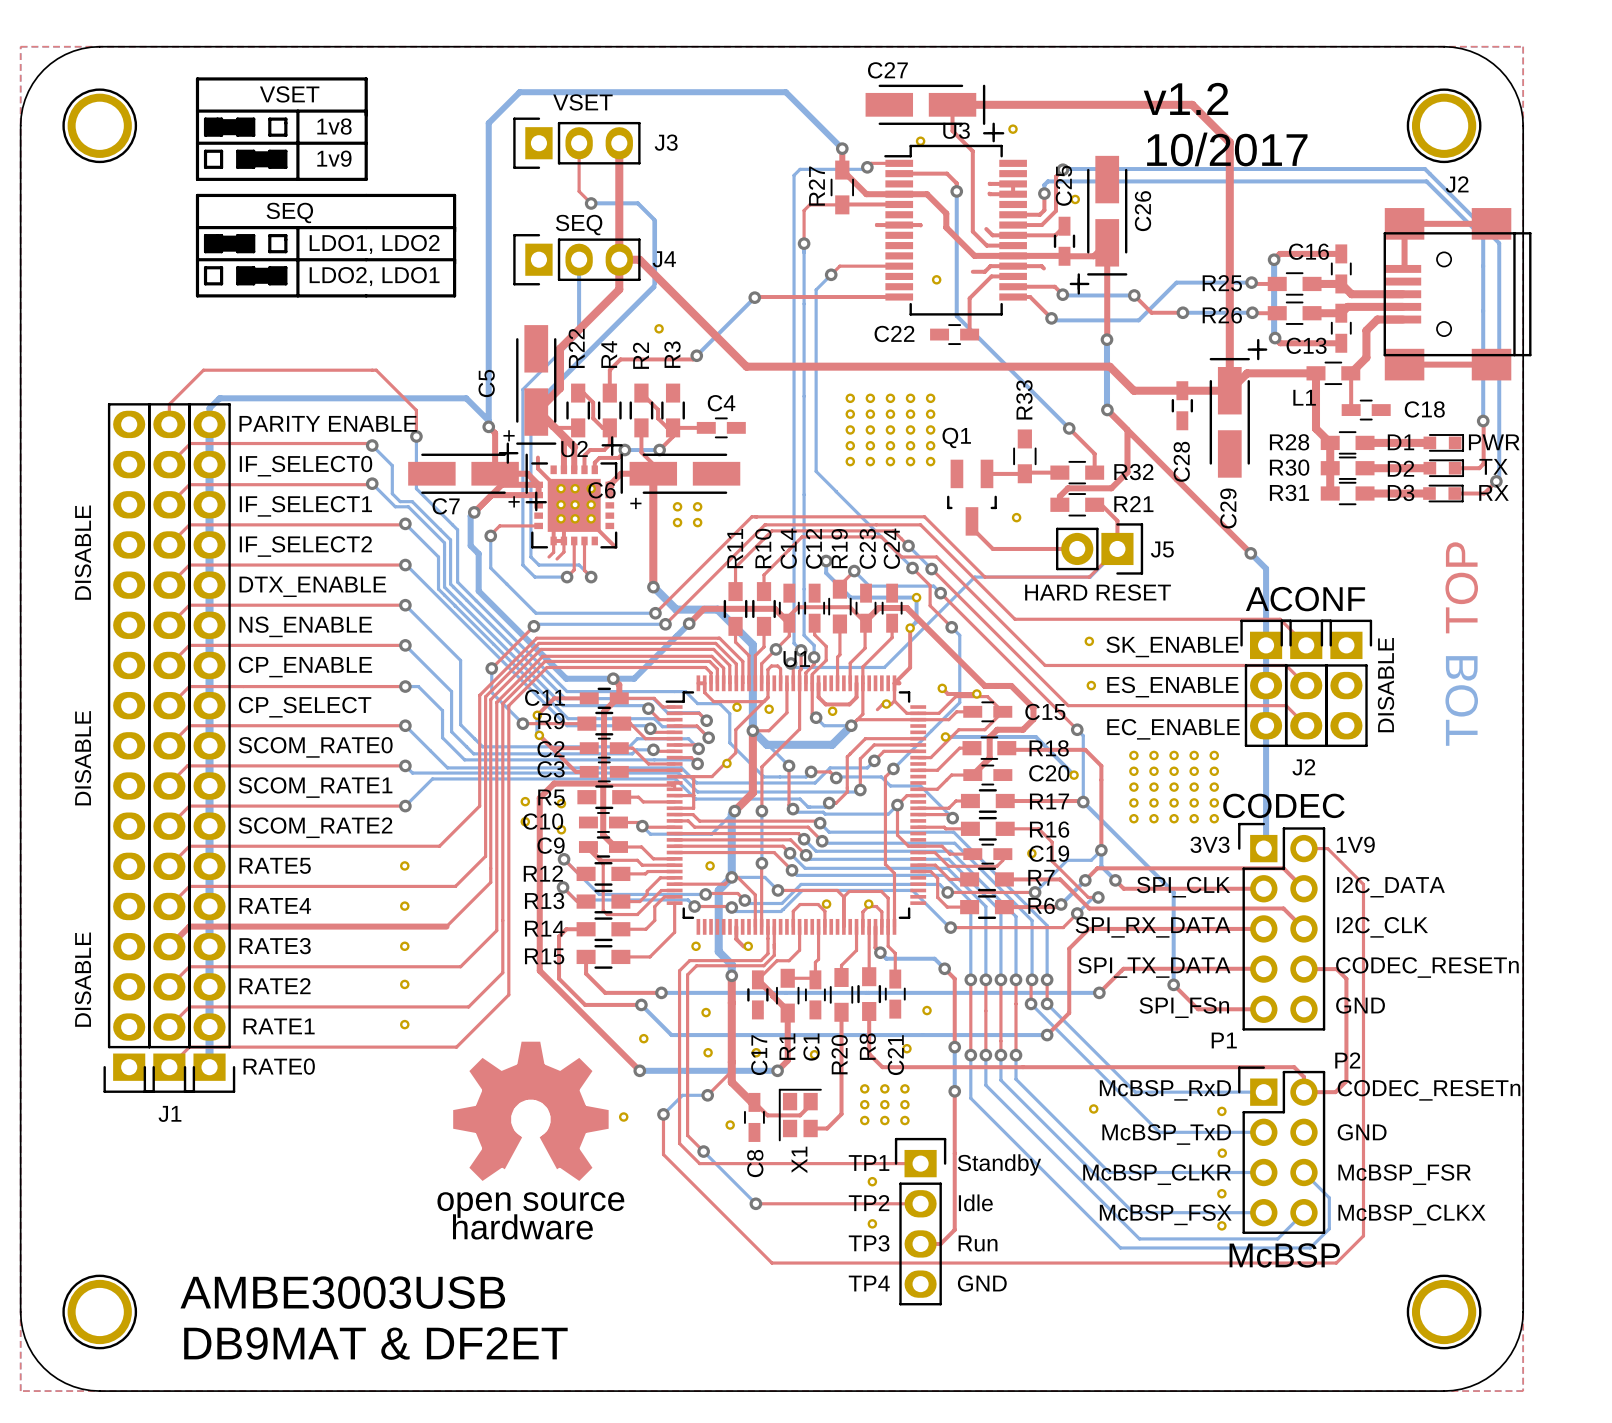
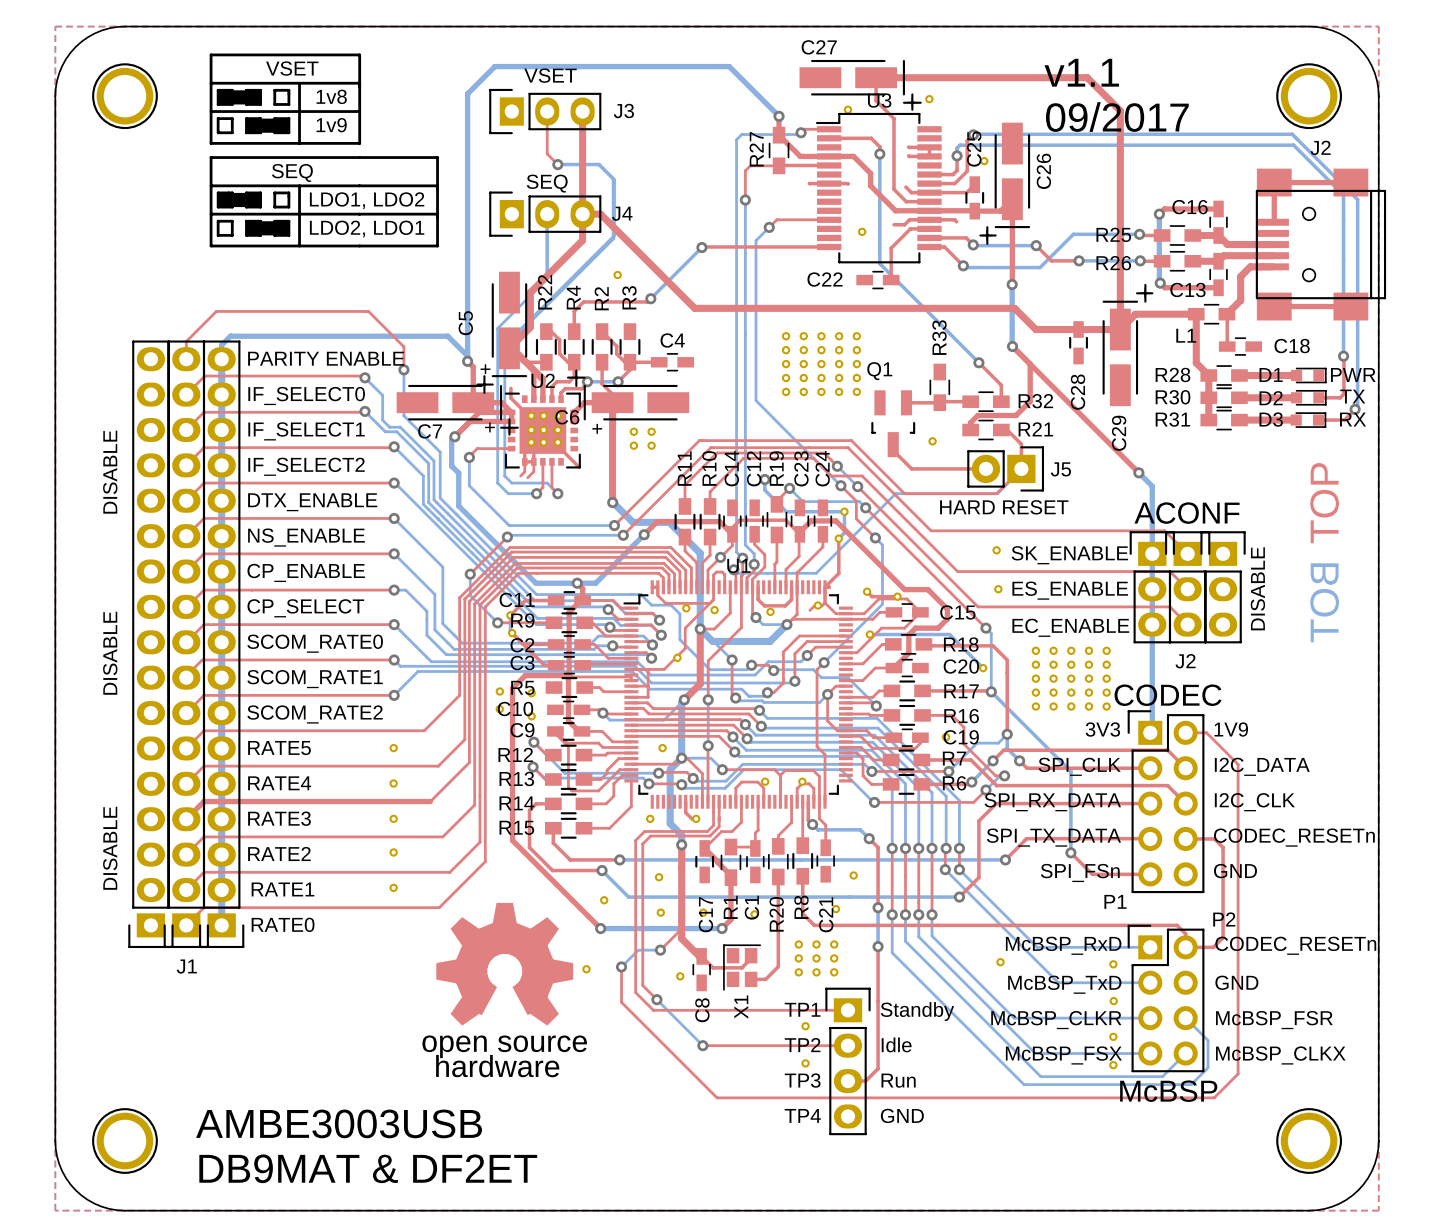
text: v1.2 (1185, 98) -> v1.1 (1081, 72)
text: 10/2017 (1227, 149) -> 09/2017 (1117, 117)

